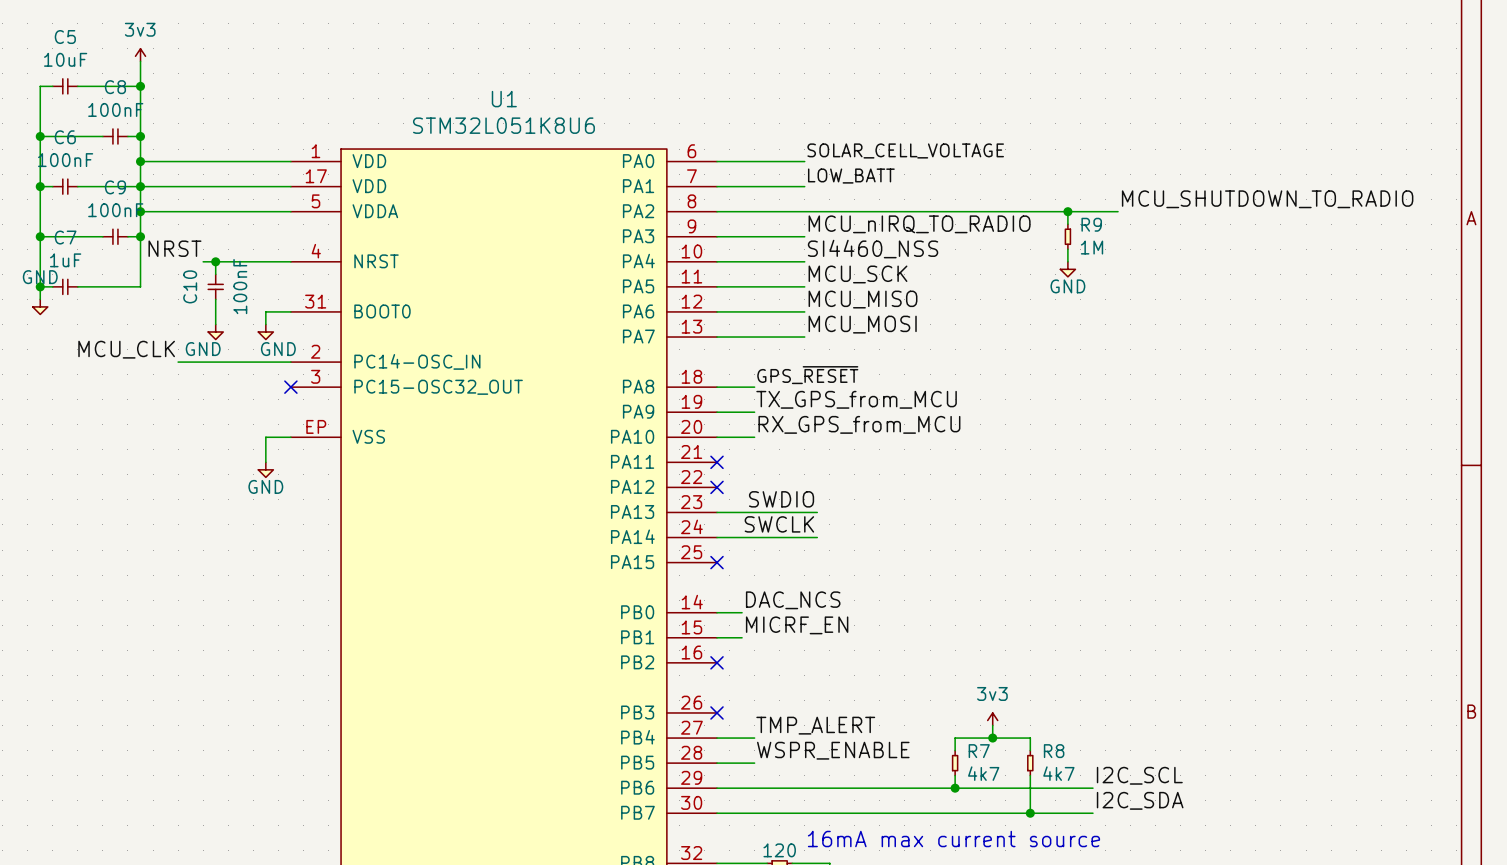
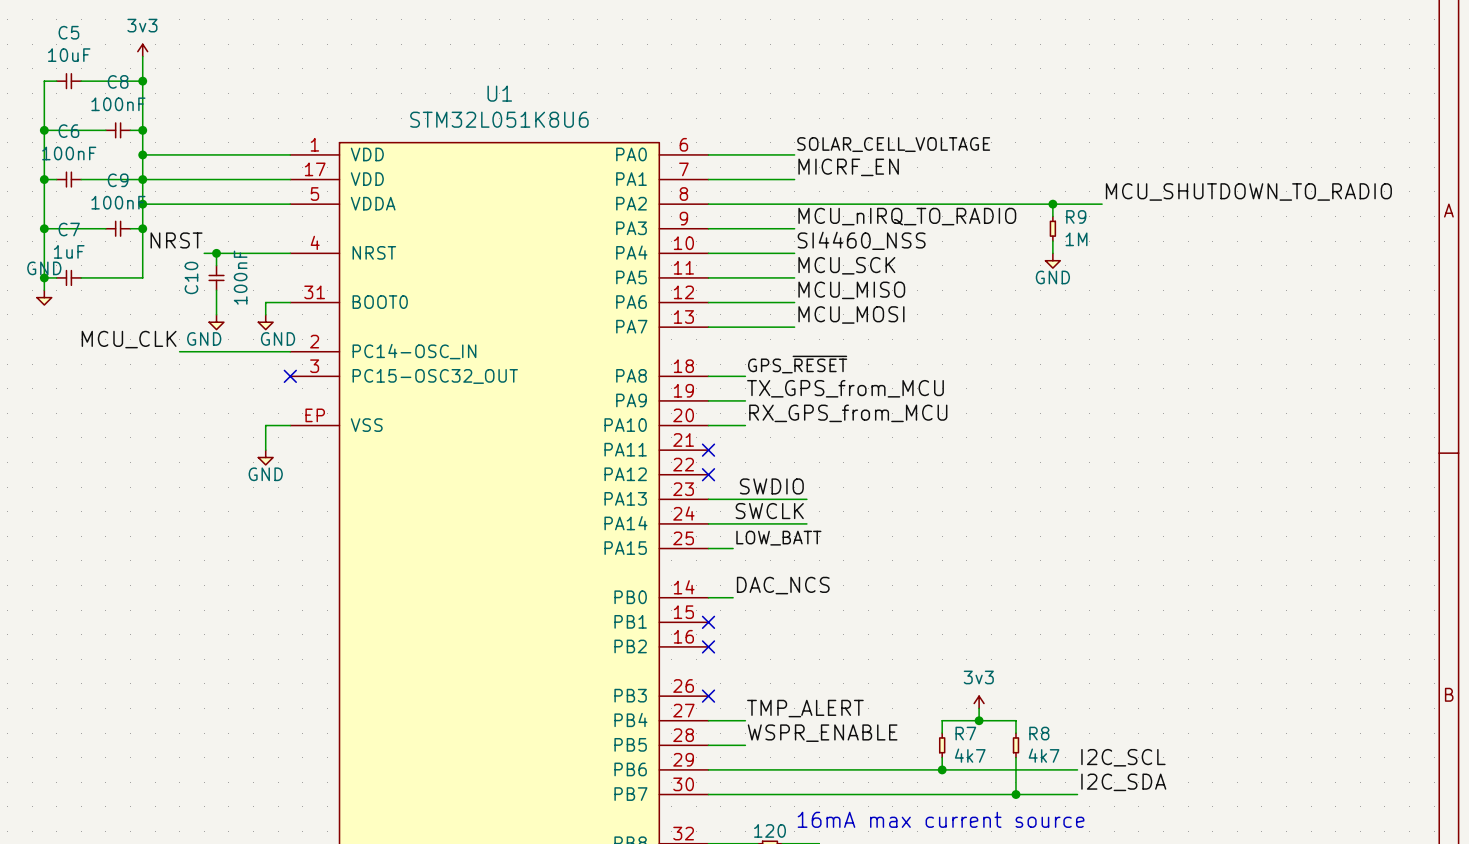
label: LOW_BATT (851, 176) -> MICRF_EN (848, 167)
label: none -> LOW_BATT (778, 538)
no-connect mark: (717, 562) -> none
label: MICRF_EN (797, 625) -> none
wire: (717, 637) (742, 637) -> (708, 548) (733, 548)
no-connect mark: none -> (708, 622)

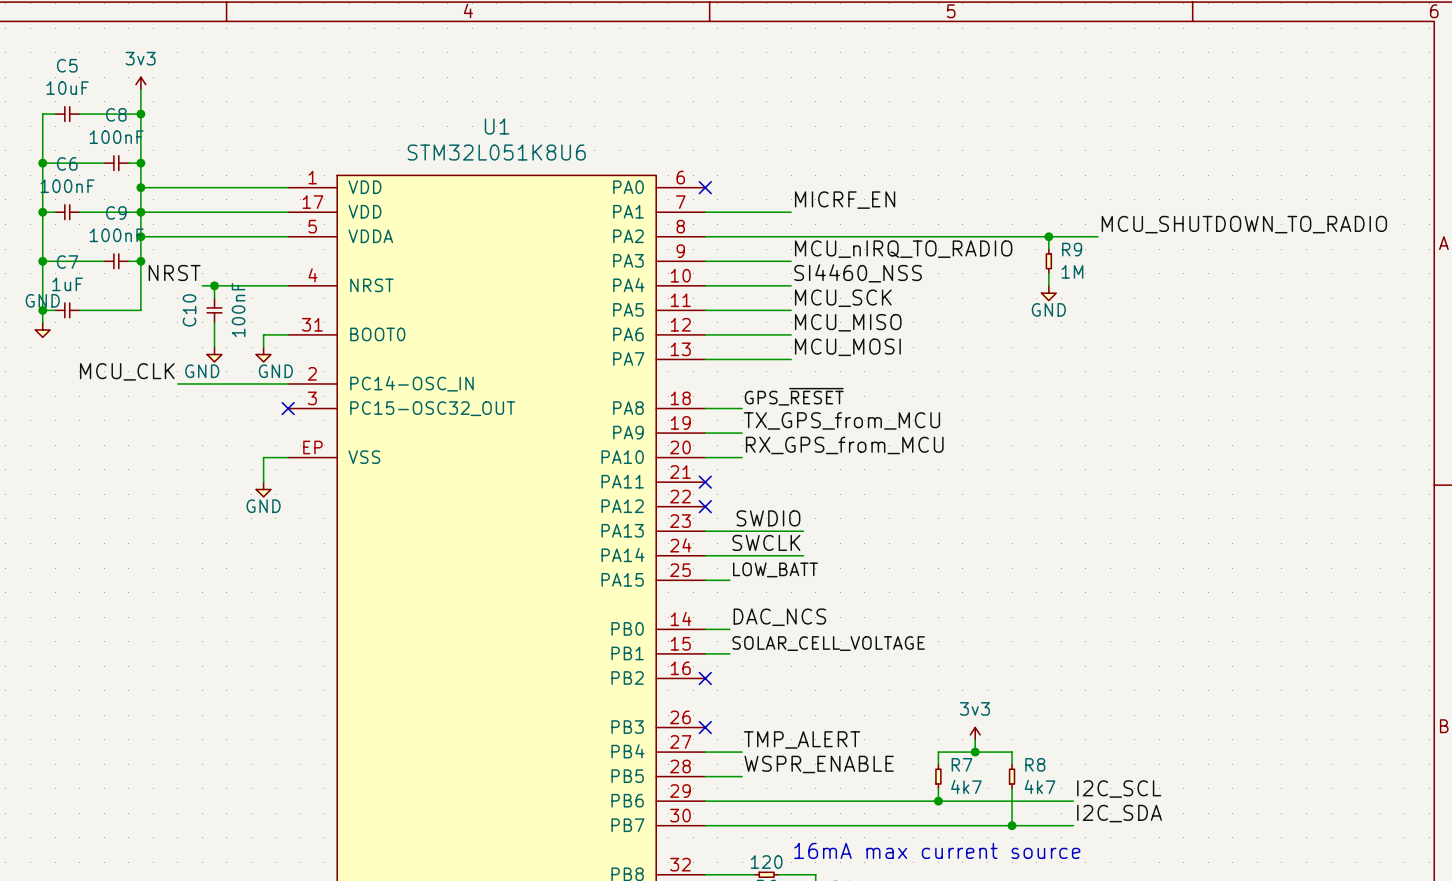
label: SOLAR_CELL_VOLTAGE (893, 144) -> none
wire: (708, 154) (794, 154) -> none
no-connect mark: none -> (705, 187)
label: none -> SOLAR_CELL_VOLTAGE (828, 643)
wire: none -> (705, 653) (729, 653)
no-connect mark: (708, 622) -> none

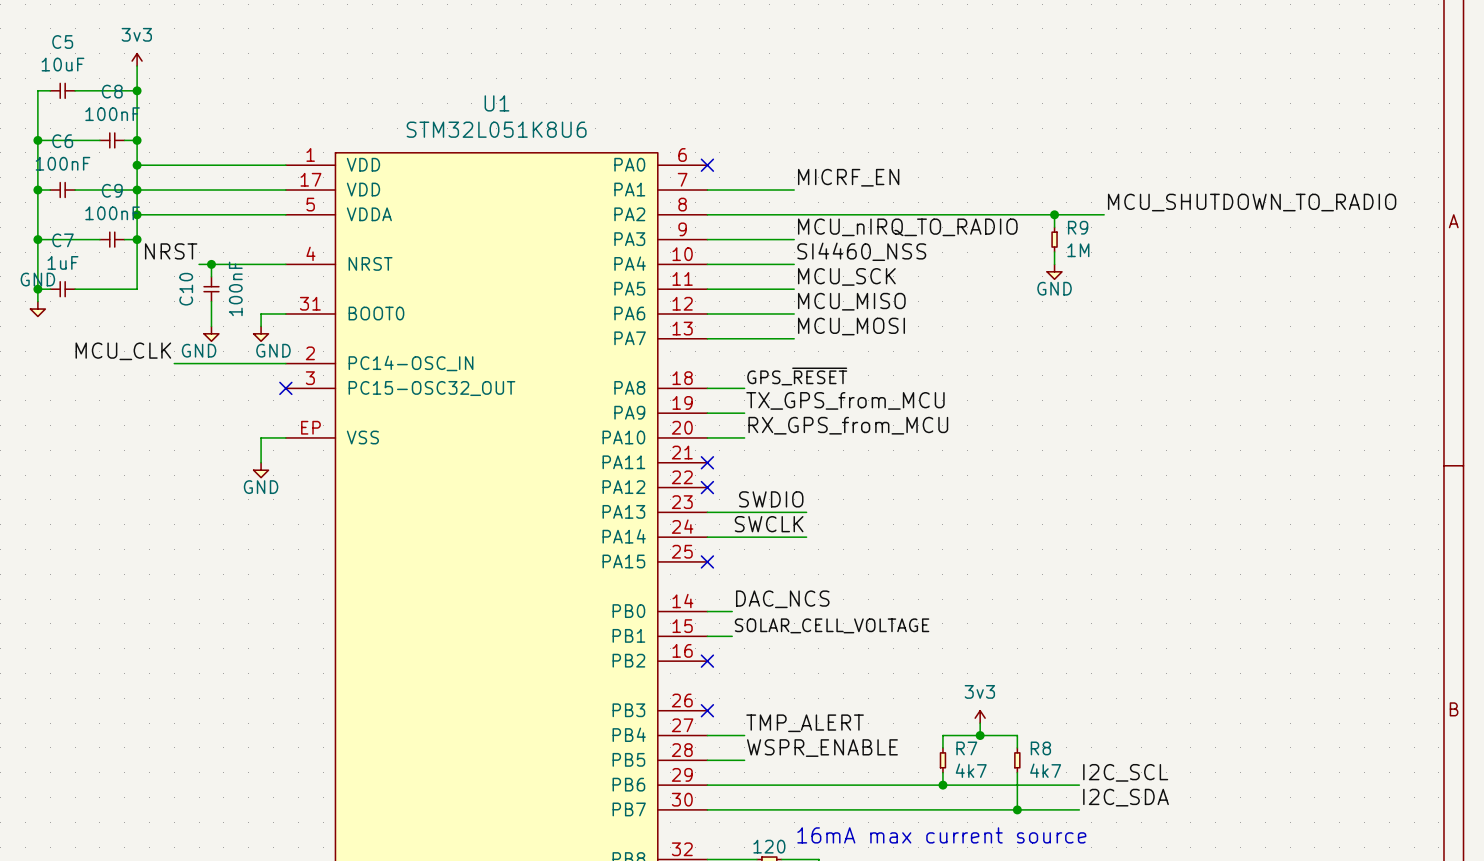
label: LOW_BATT (775, 569) -> none
wire: (705, 580) (729, 580) -> none
no-connect mark: none -> (707, 561)

